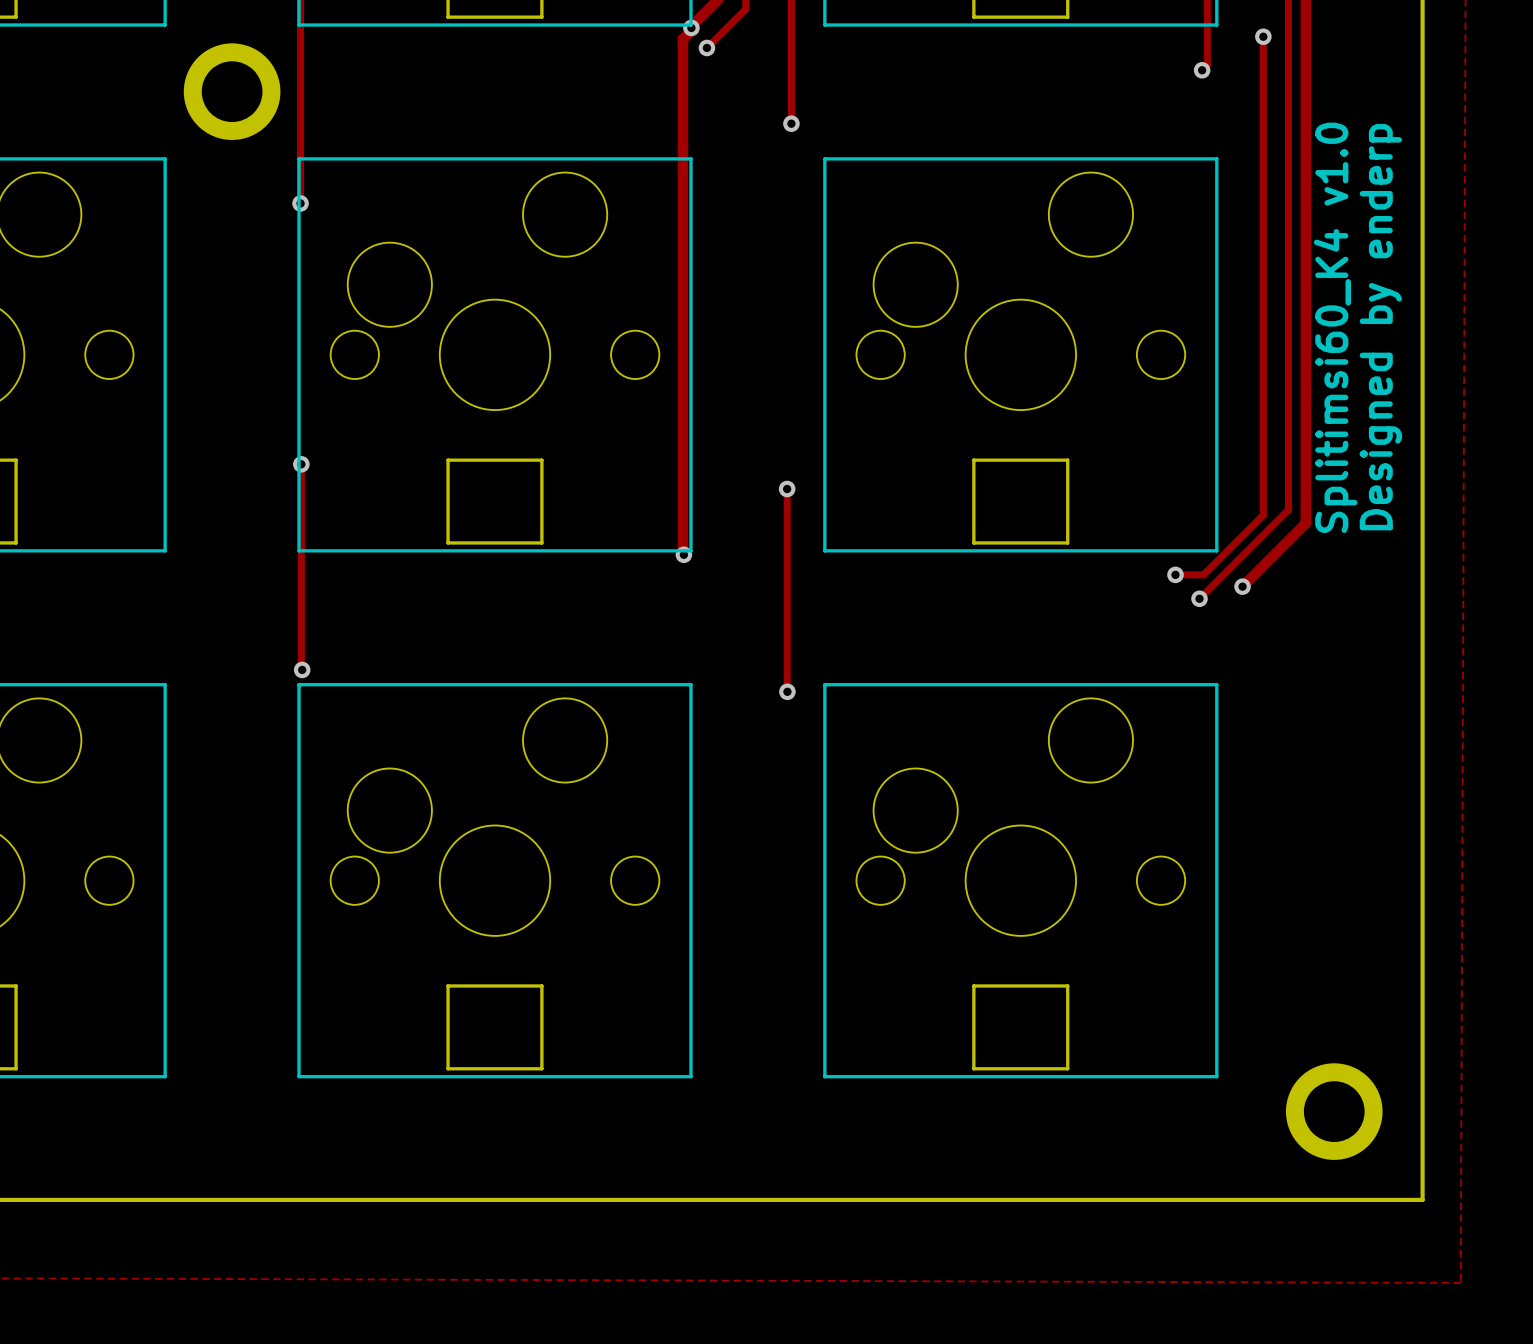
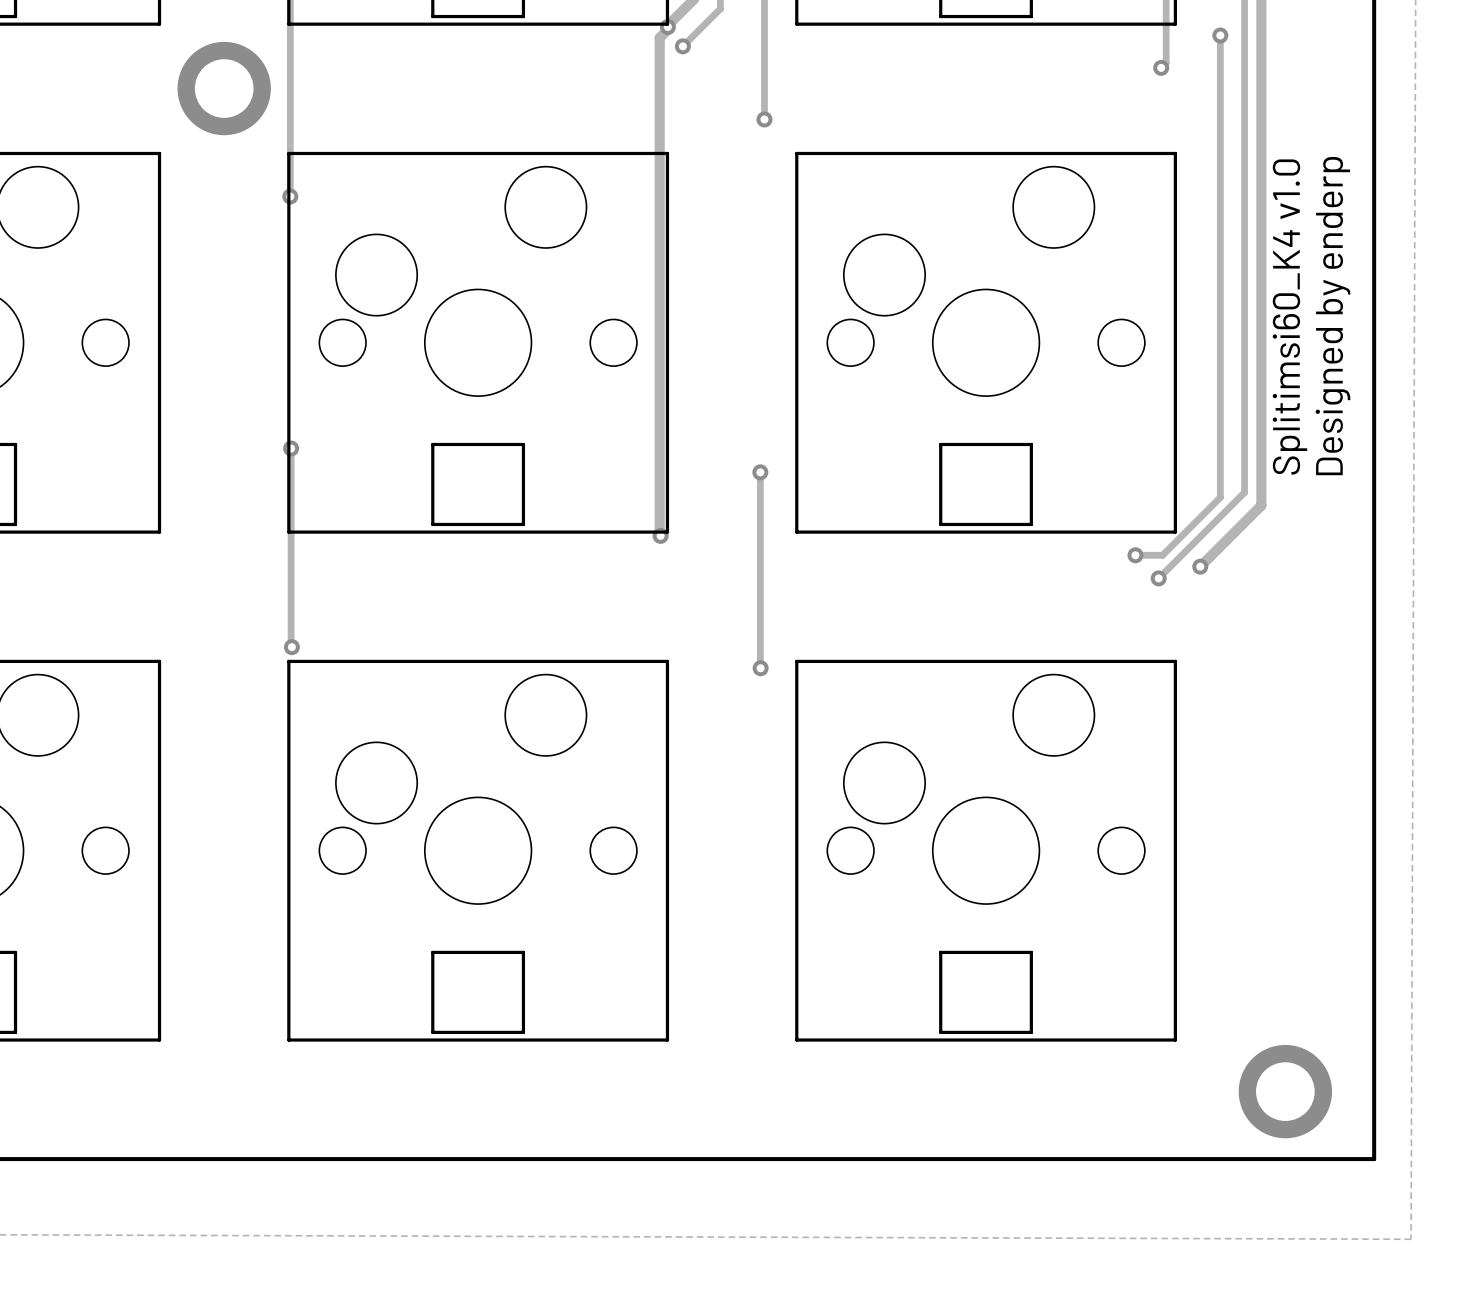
part position: (1334, 1111) -> (1285, 1091)

